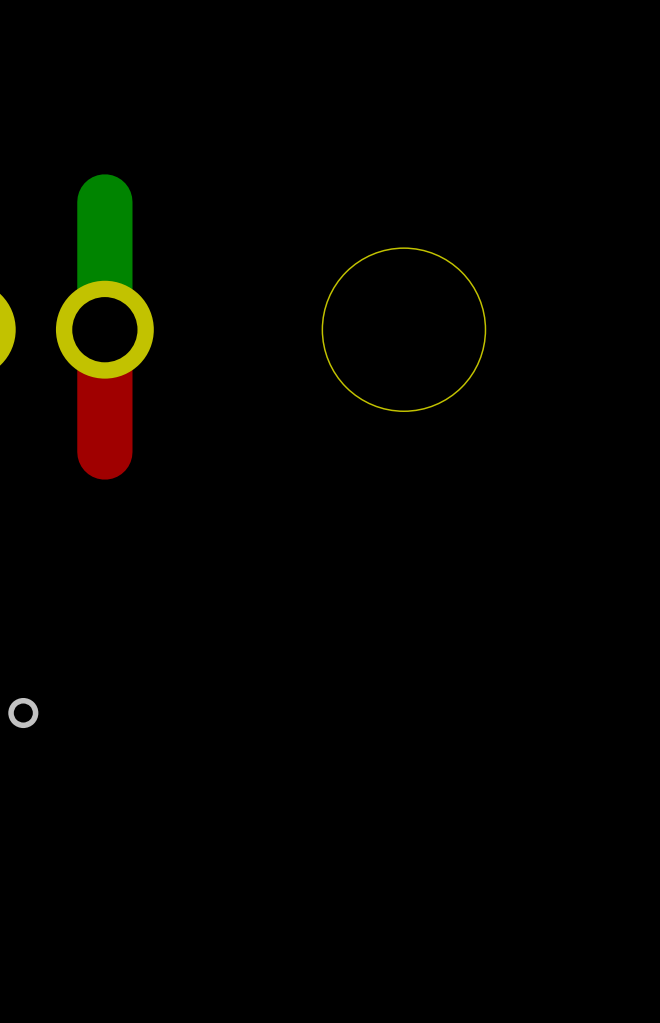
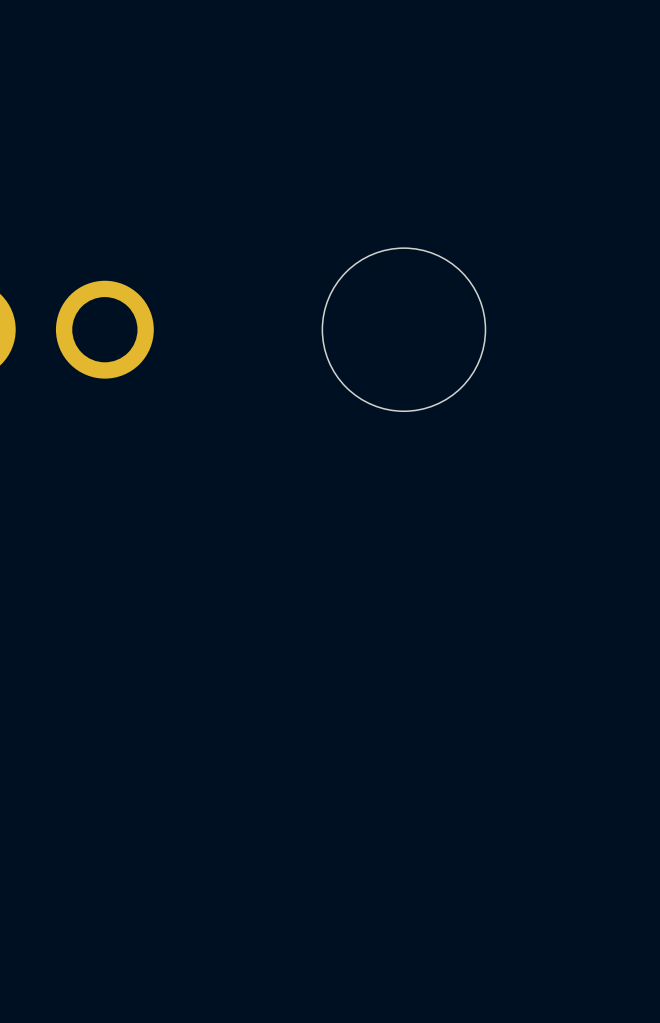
bottom track: (104, 201) (104, 329) -> none
top track: (104, 329) (104, 452) -> none
via: (23, 713) -> none

